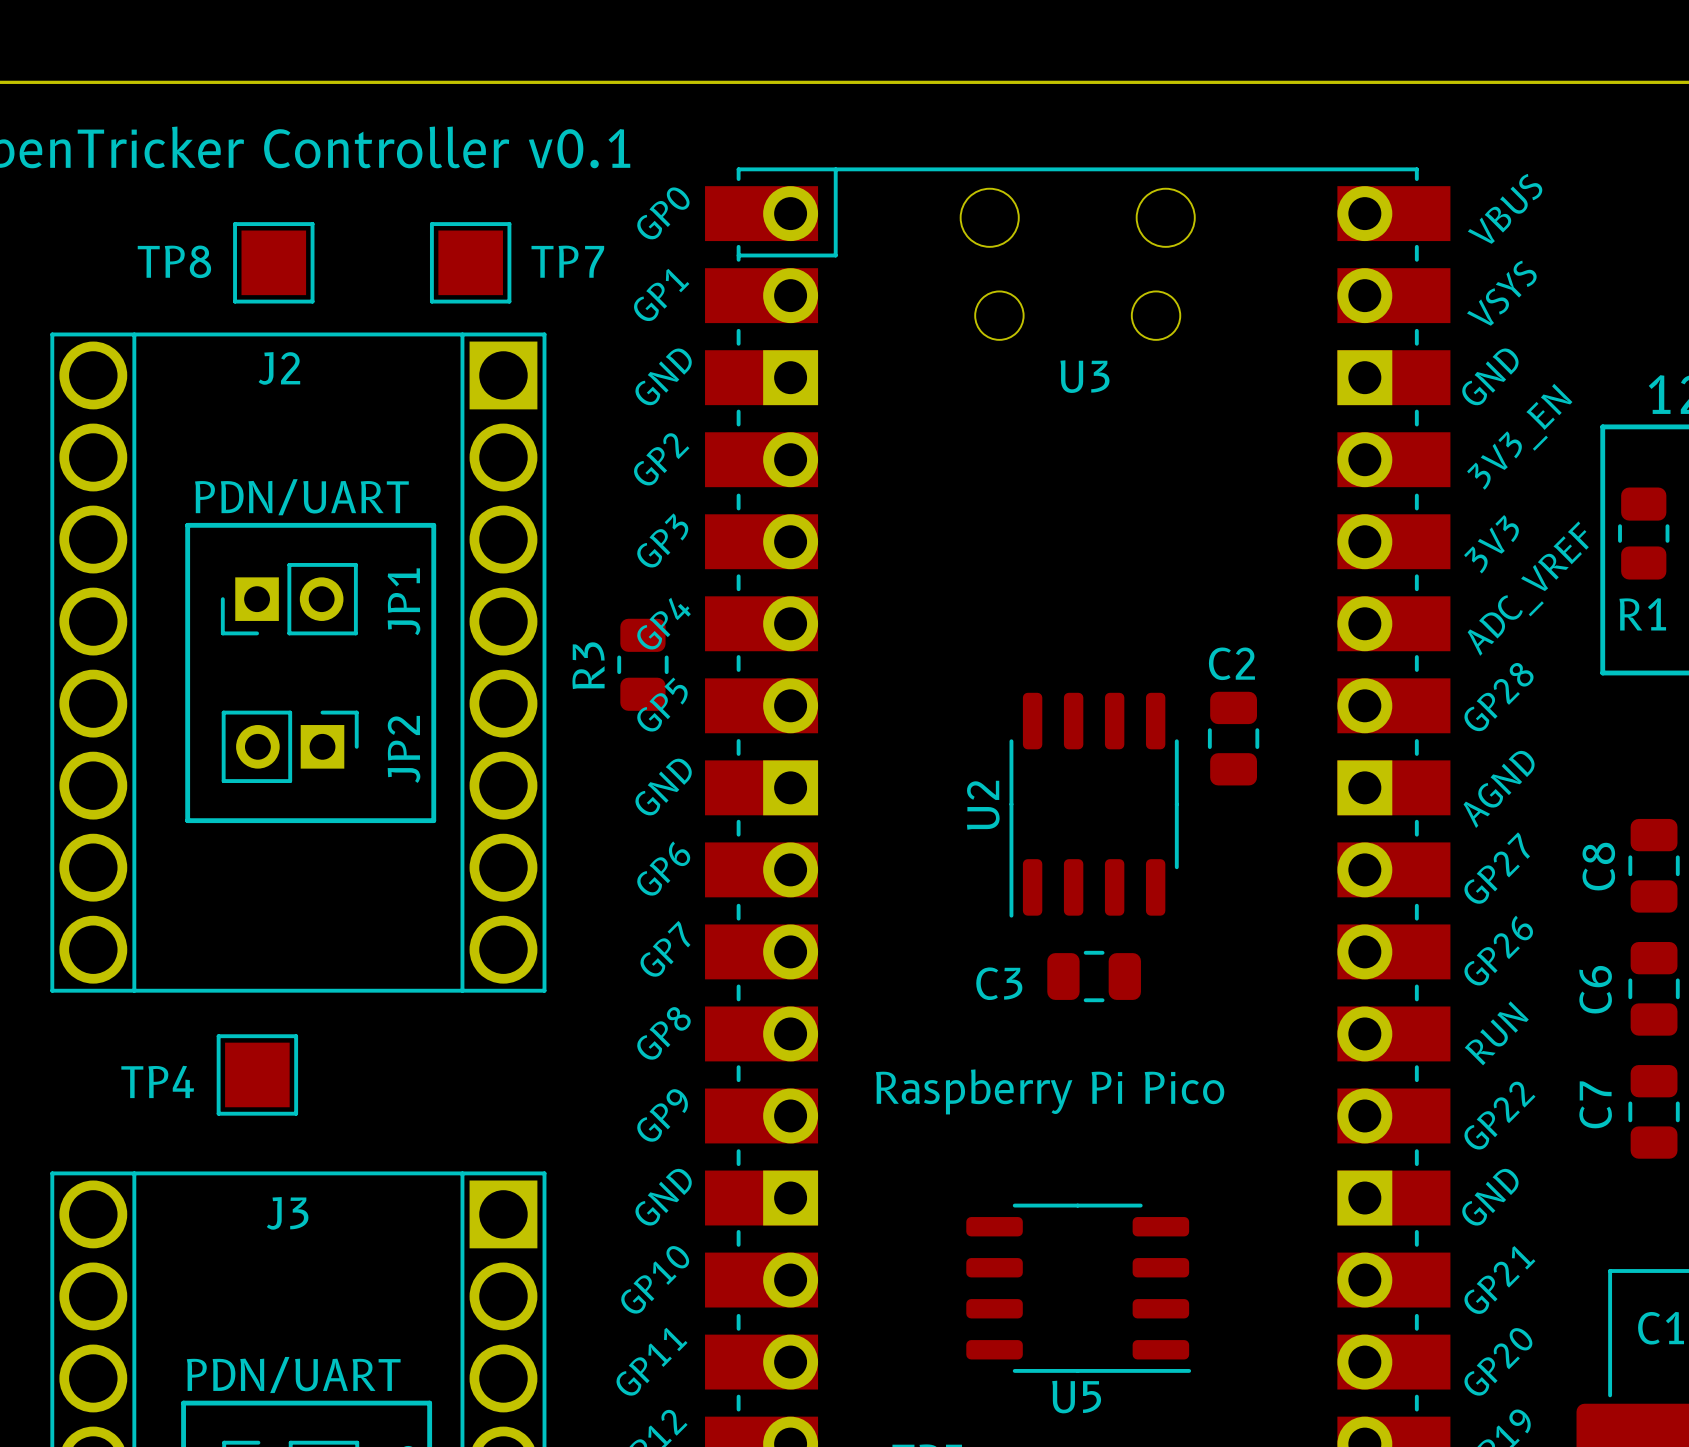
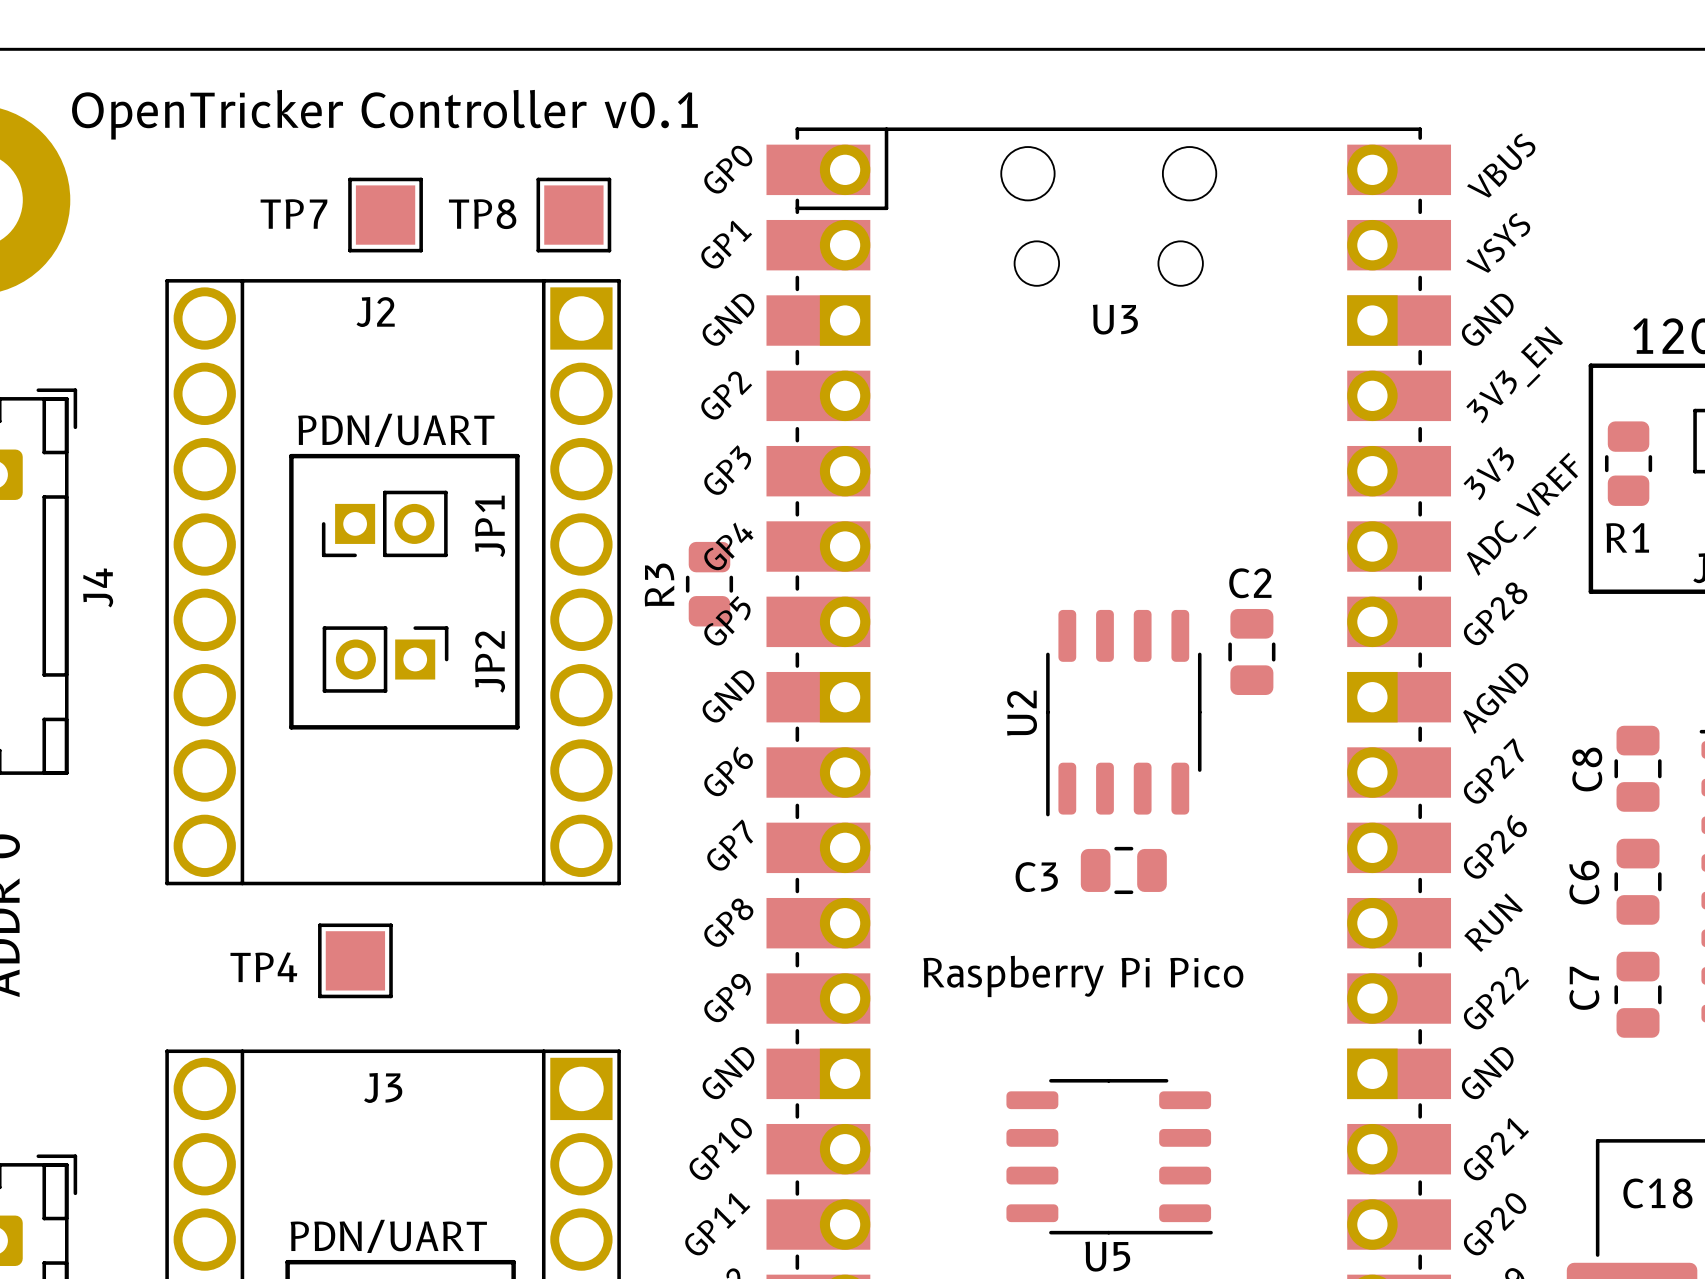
TP7 name position: TP7 (567, 261) -> TP7 (293, 214)
TP8 position: (273, 262) -> (573, 215)
TP7 position: (470, 262) -> (385, 215)

